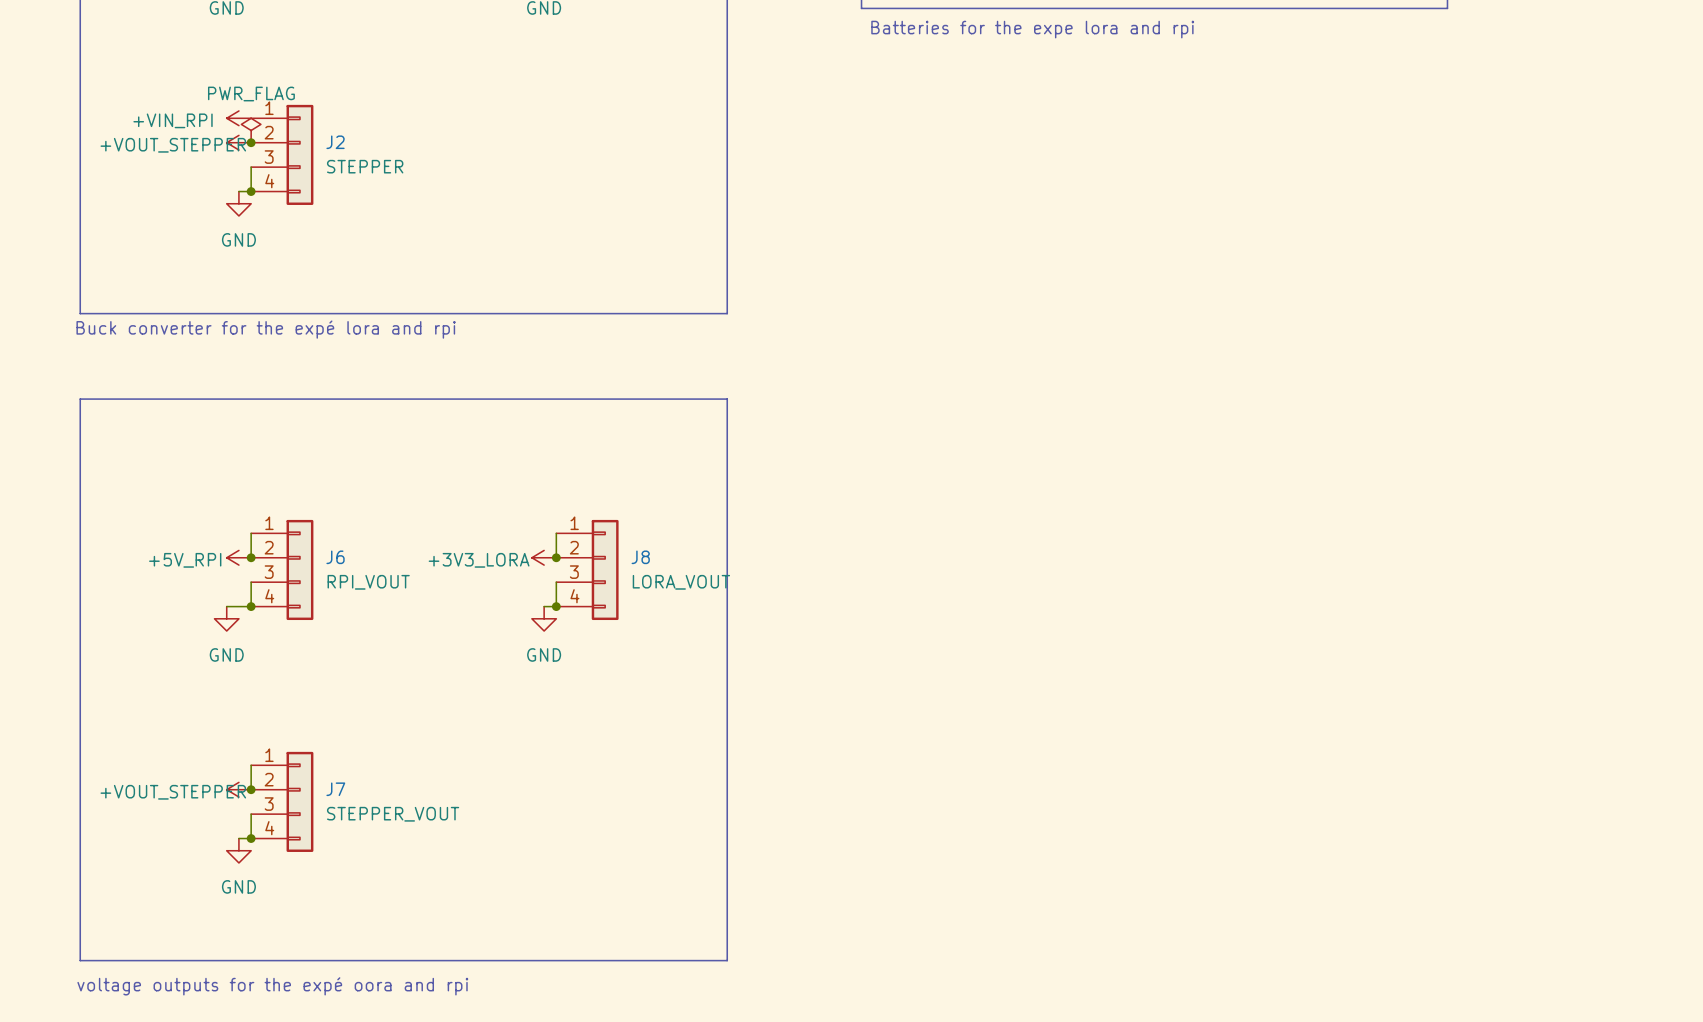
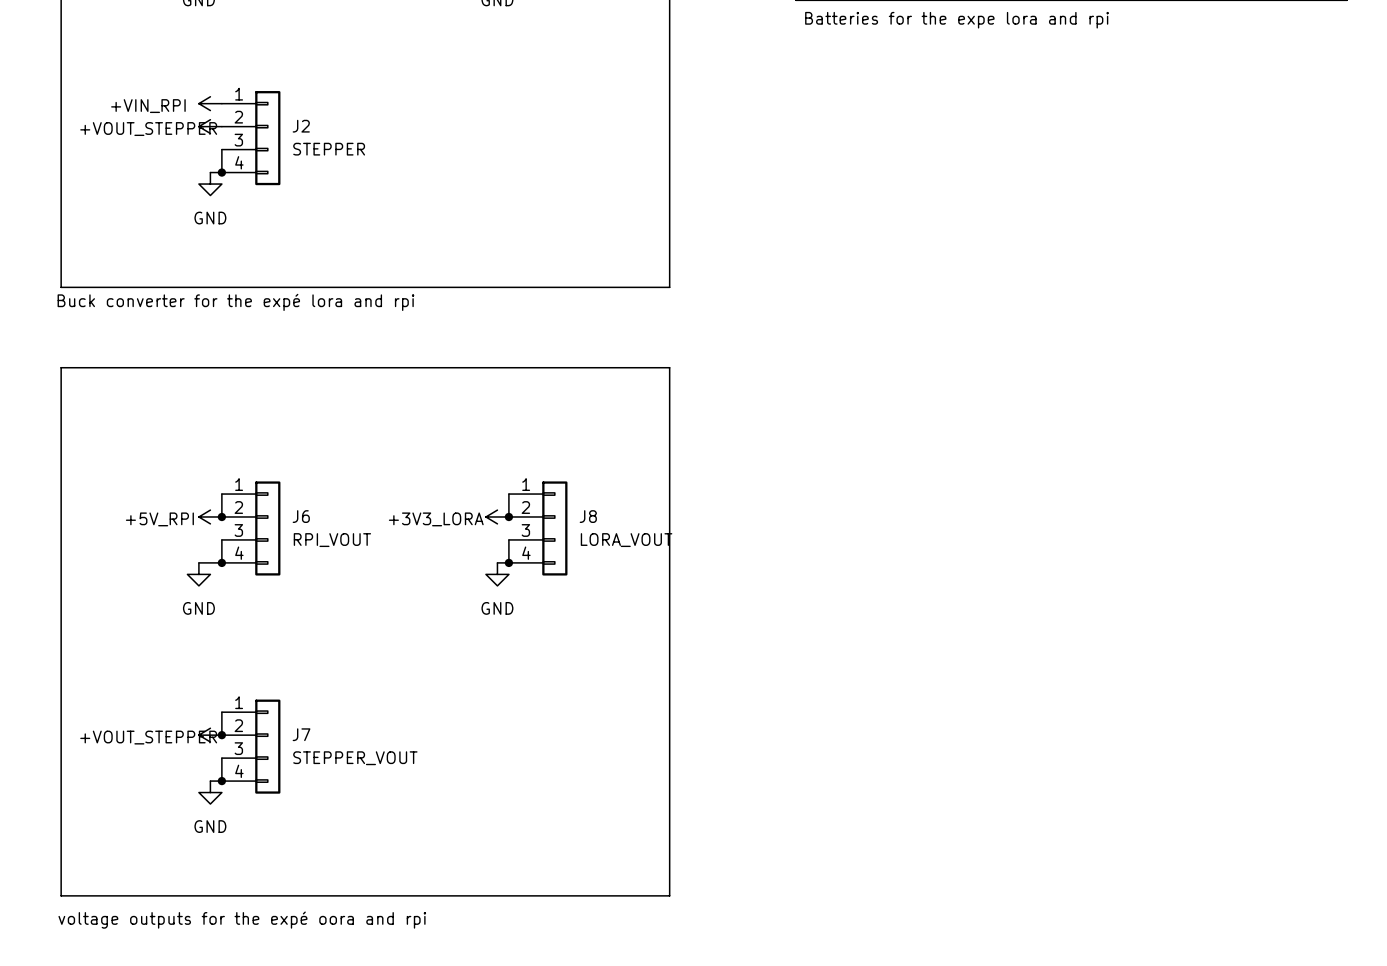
power symbol: PWR_FLAG (251, 130) -> none
junction: (251, 142) -> none

